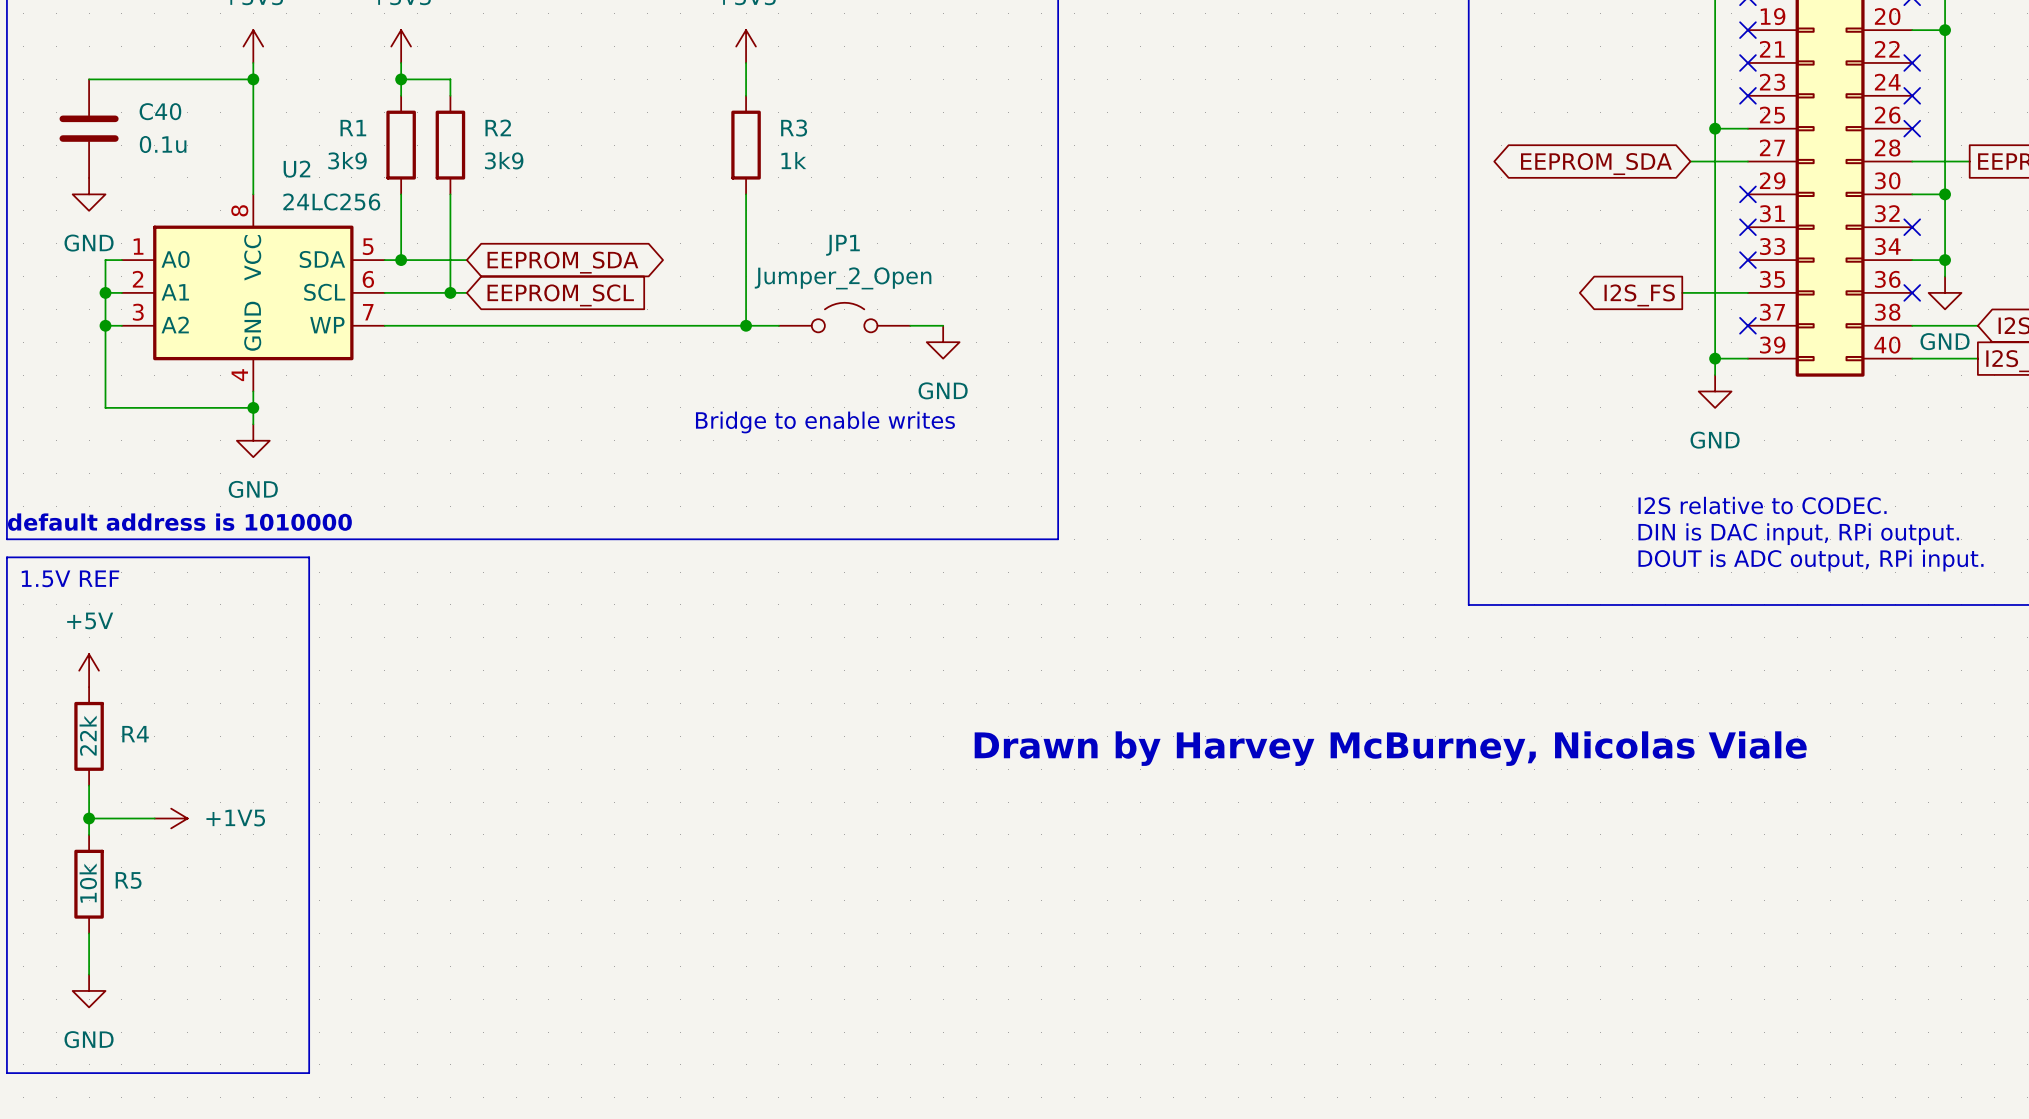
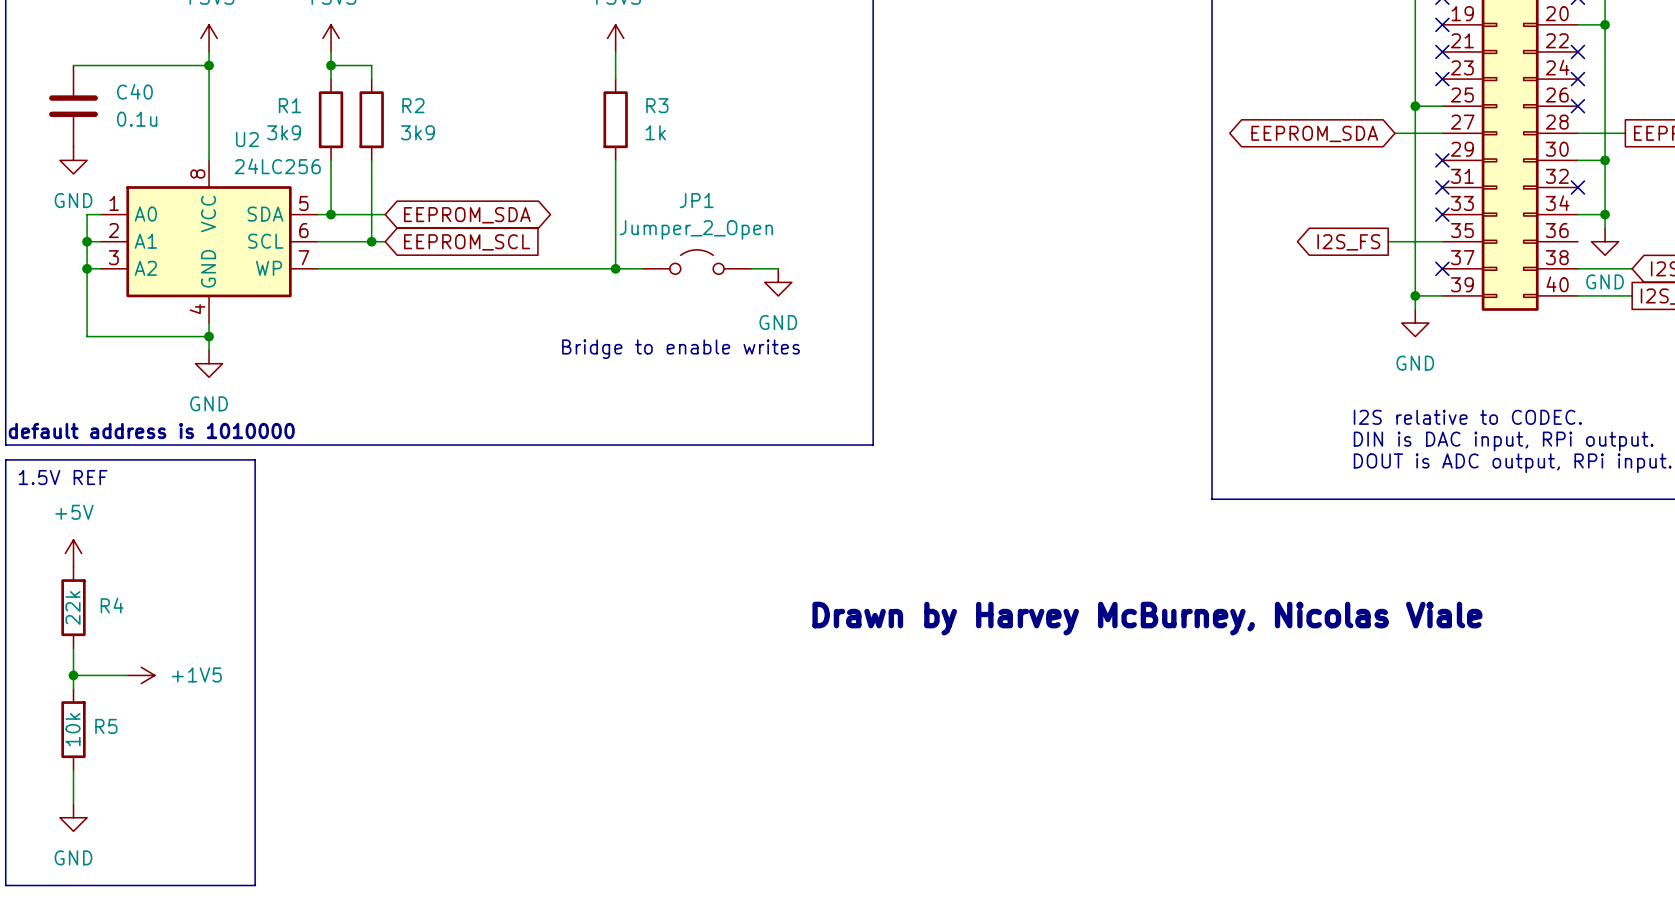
no-connect mark: (1912, 292) -> none

